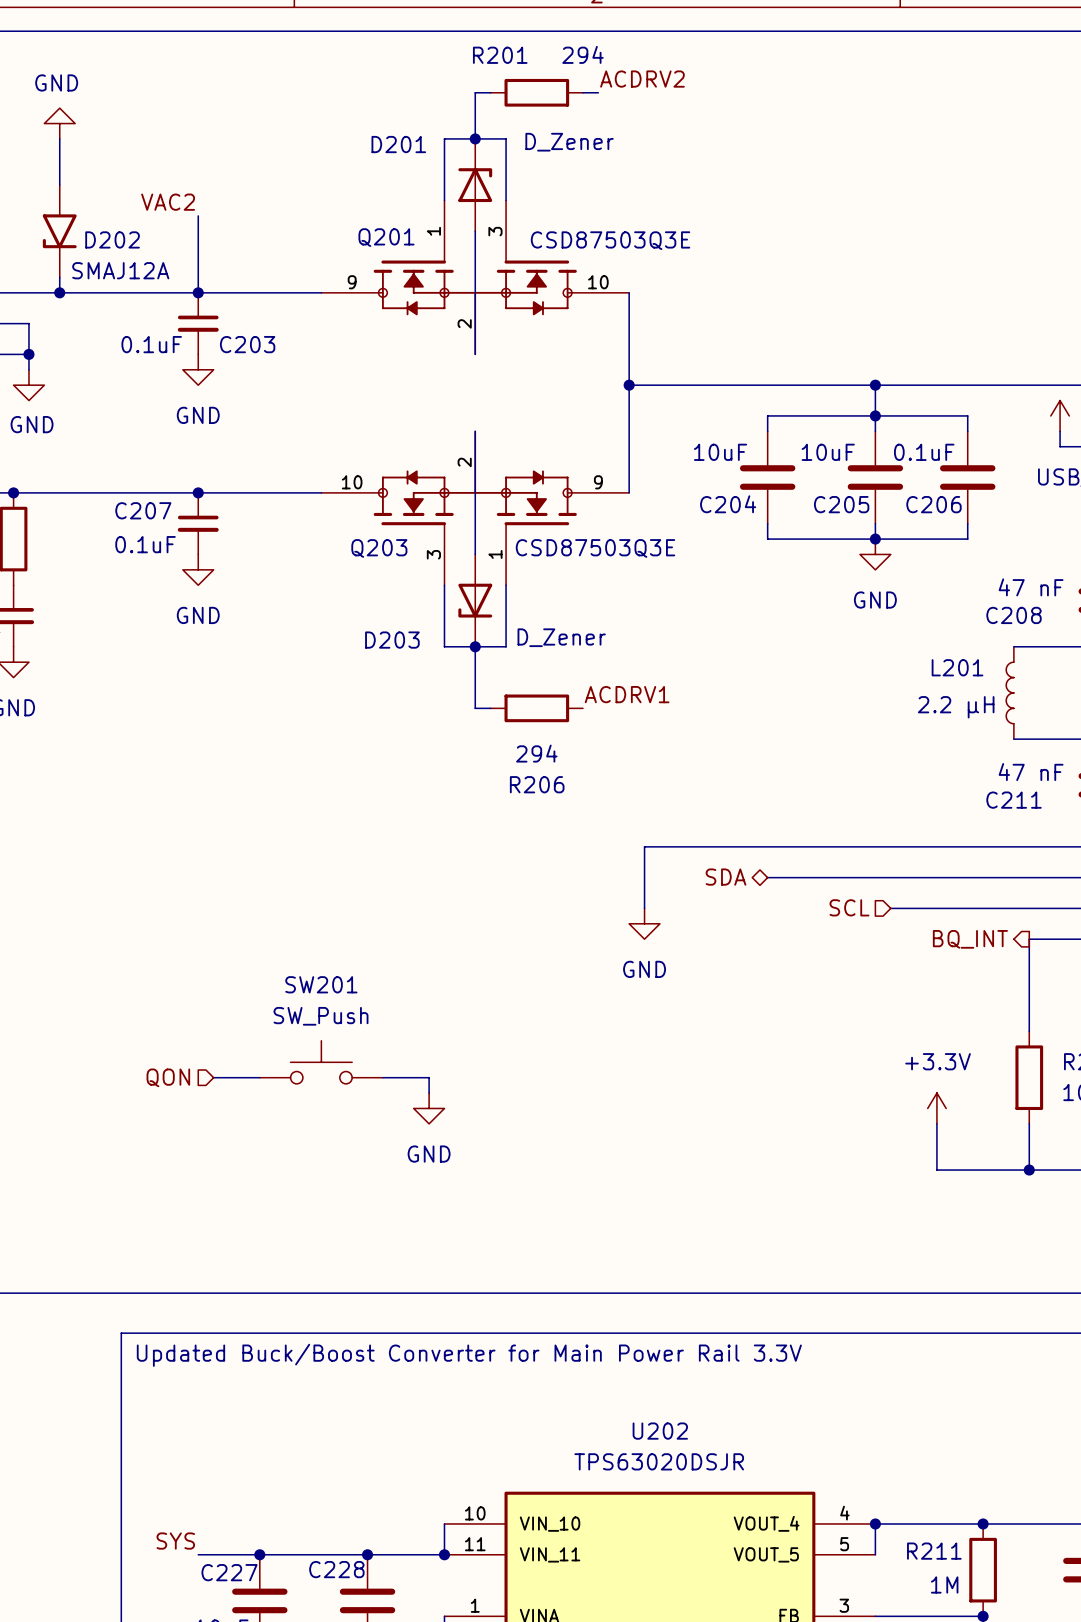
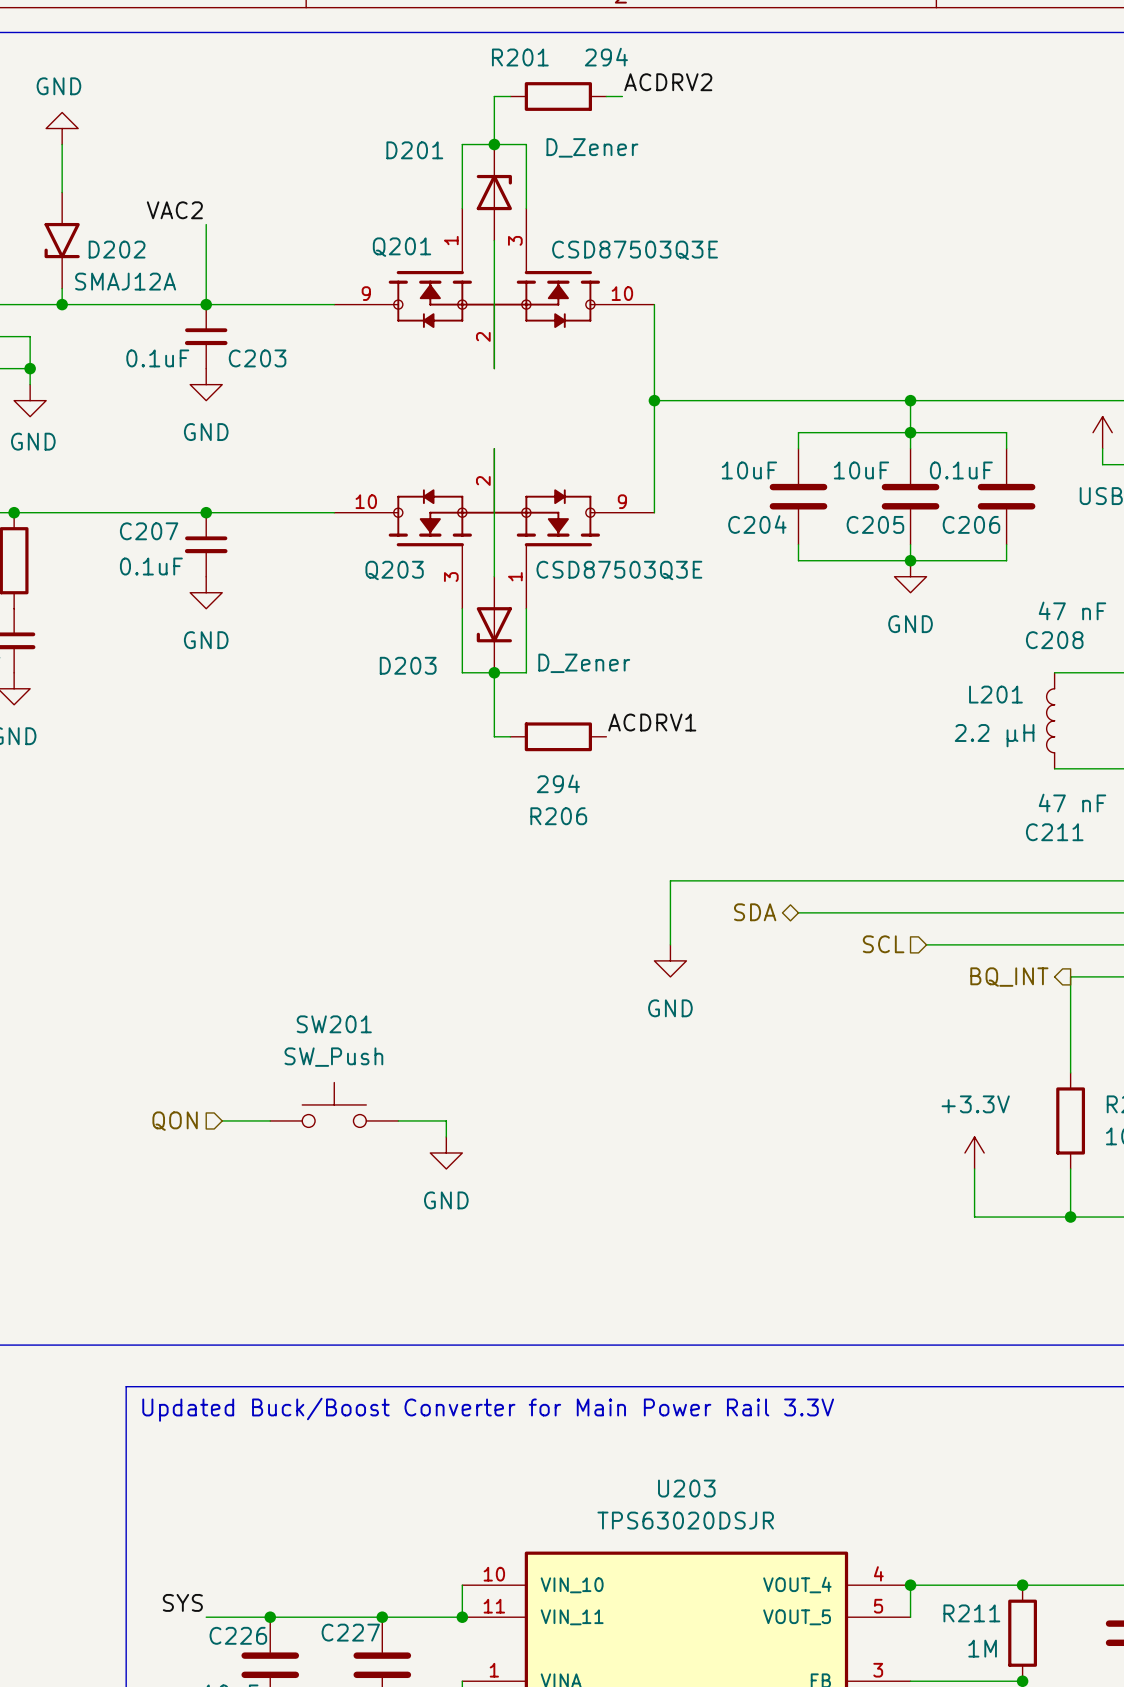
U202 name: U202 (660, 1431) -> U203 (686, 1488)
C228 name: C228 (336, 1569) -> C227 (350, 1632)
C227 name: C227 (229, 1572) -> C226 (238, 1635)

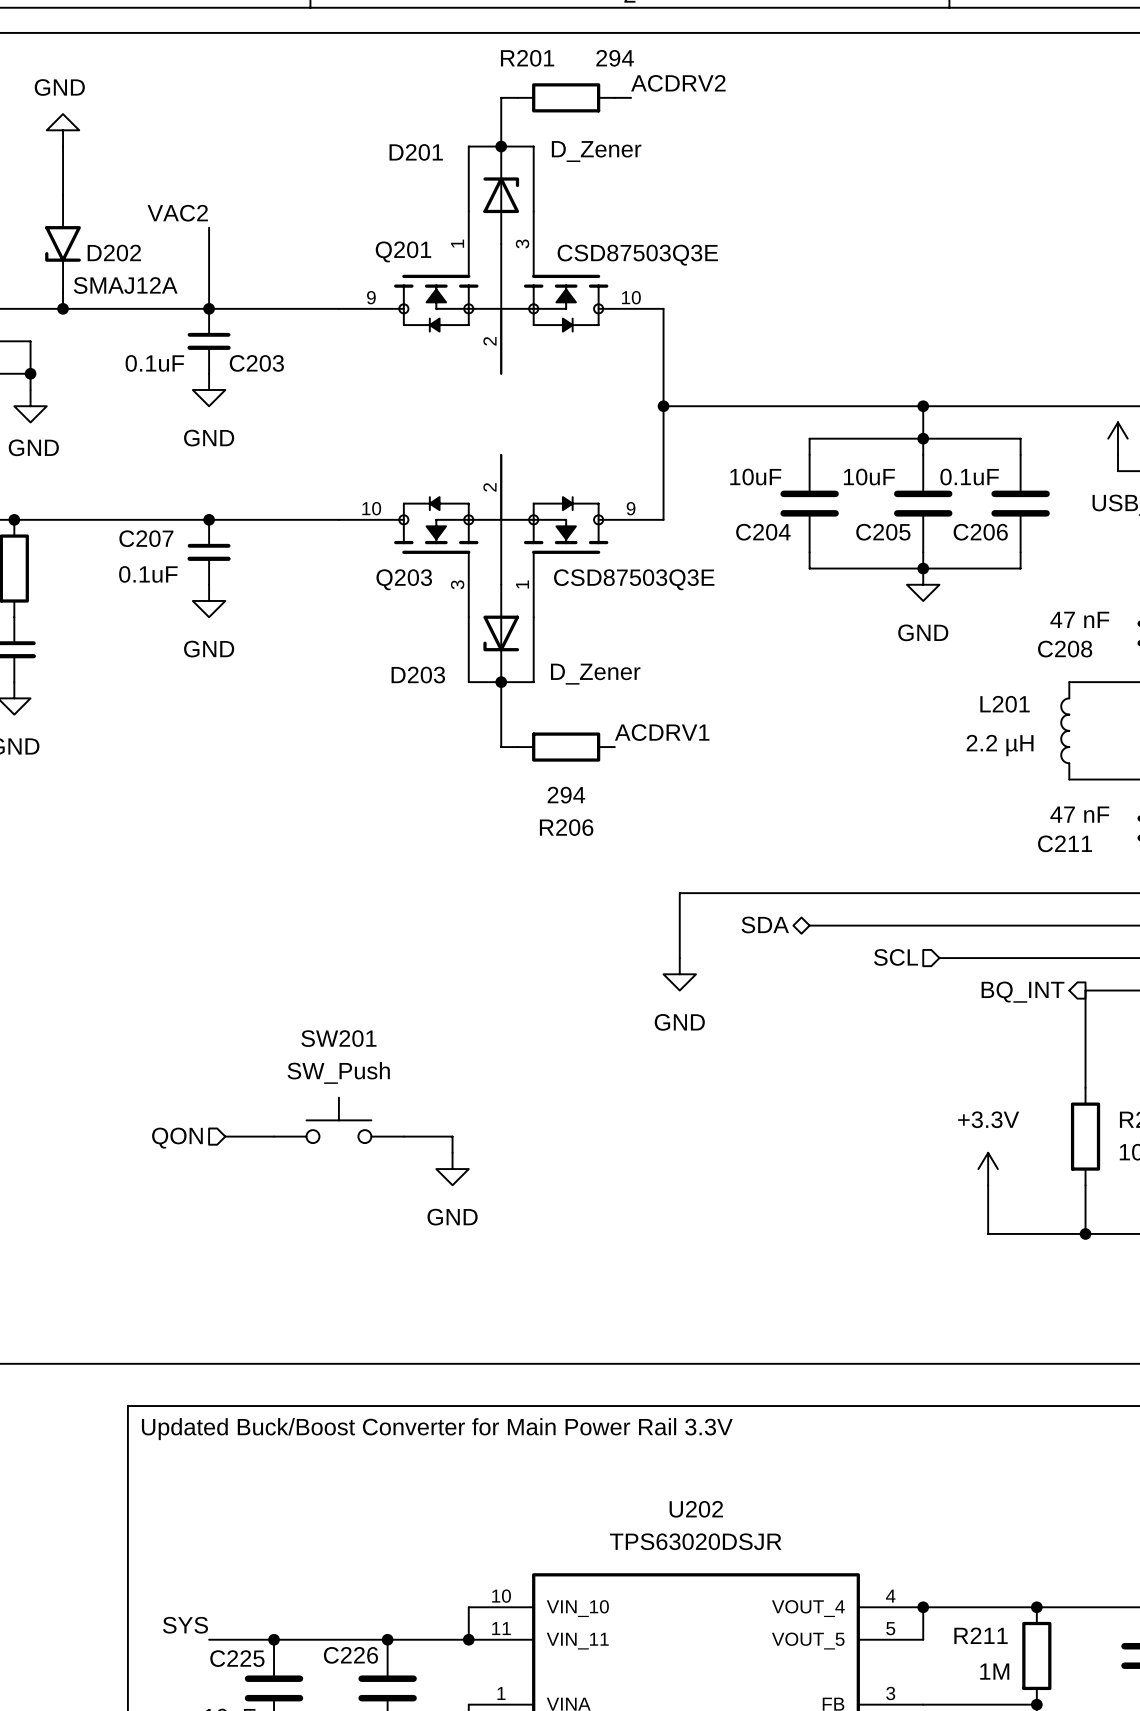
U203 name: U203 (686, 1488) -> U202 (696, 1509)
C227 name: C227 (350, 1632) -> C226 (350, 1655)
C226 name: C226 (238, 1635) -> C225 (237, 1658)

